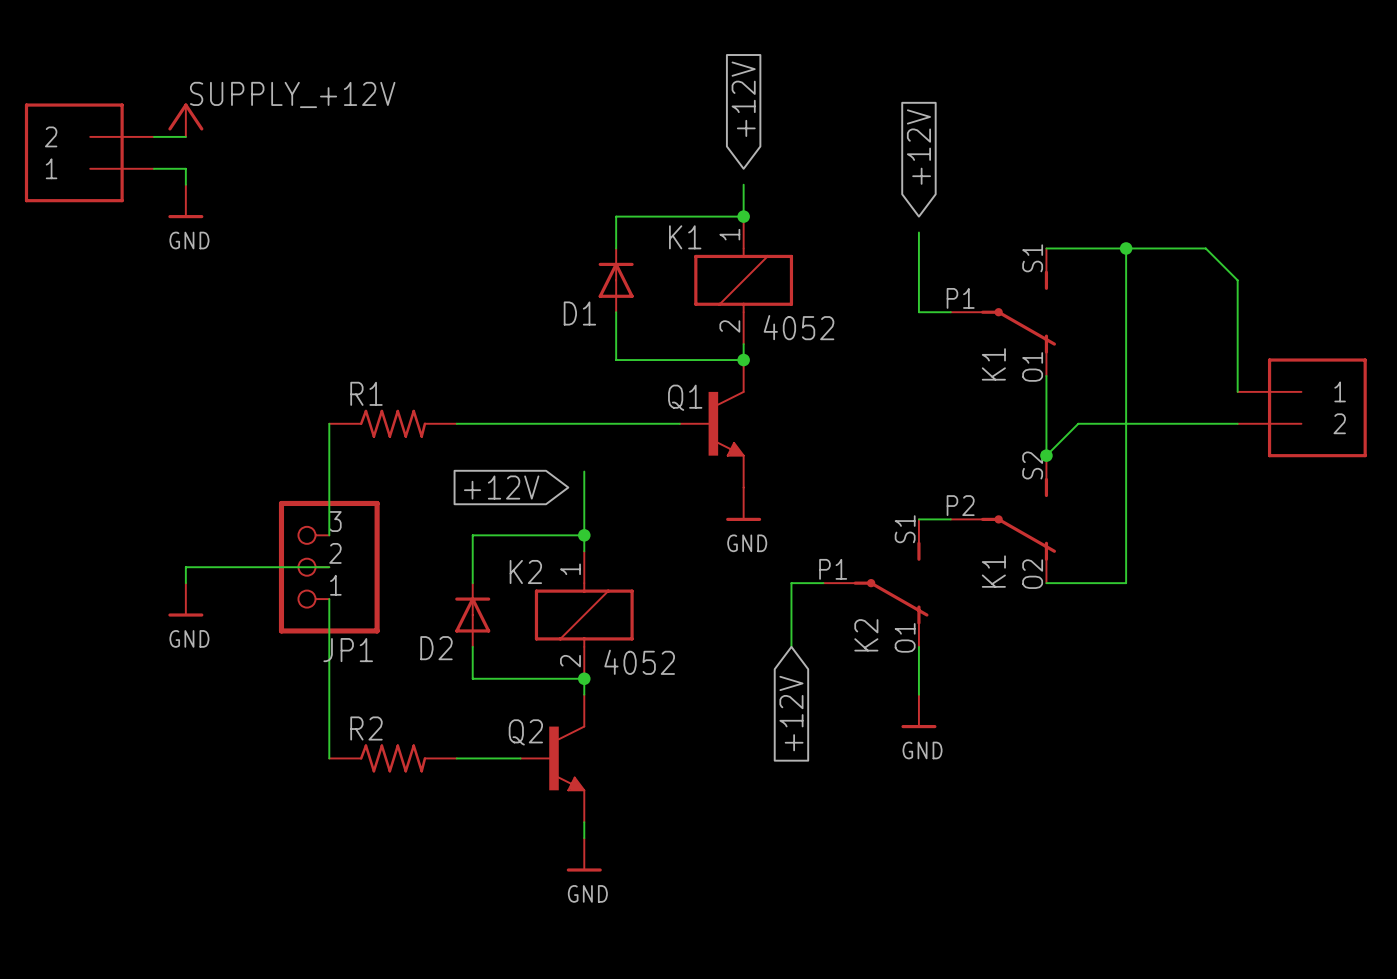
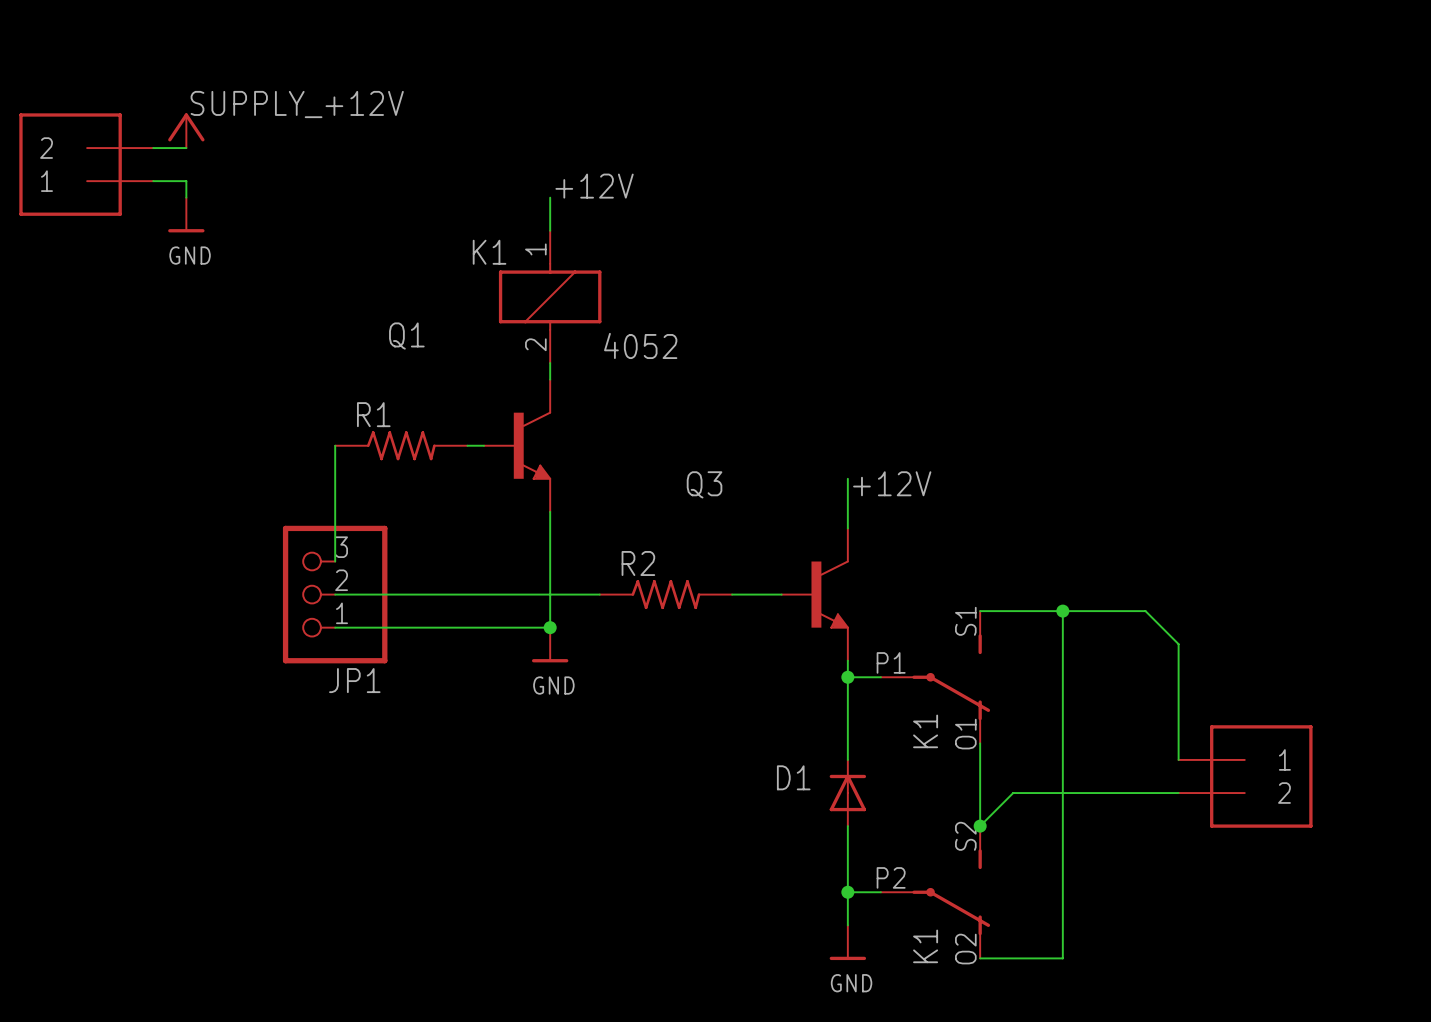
global label: +12V (743, 99) -> none
global label: +12V (918, 147) -> none
label: none -> +12V (594, 186)
wire: none -> (550, 197) (550, 230)
wire: (743, 184) (743, 216) (616, 216) (616, 248) -> none
junction: (743, 216) -> none
wire: (918, 232) (918, 312) (950, 312) -> none
wire: (1046, 248) (1205, 248) (1237, 280) (1237, 391) -> none
wire: (1126, 248) (1126, 583) (1110, 583) -> (1178, 759) (1178, 644) (1145, 611)
junction: (1126, 248) -> none
D1 position: (616, 280) -> (847, 793)
K1 position: (743, 280) -> (550, 296)
wire: (616, 312) (616, 360) (743, 360) (743, 344) -> none
K1: (1003, 312) -> none
D1 name position: D1 (579, 313) -> D1 (793, 777)
K1 value position: 4052 (799, 327) -> 4052 (640, 345)
wire: none -> (550, 363) (550, 379)
junction: (743, 360) -> none
wire: (1046, 375) (1046, 455) (1078, 423) (1237, 423) -> none
Q1 name position: Q1 (685, 397) -> Q1 (406, 336)
part: (1302, 407) -> none
wire: (472, 423) (679, 423) -> none
Q1 position: (712, 423) -> (517, 445)
junction: (1046, 455) -> none
label: none -> +12V (892, 483)
wire: (584, 471) (584, 551) -> none
global label: +12V (501, 487) -> none
power symbol: GND (743, 504) -> none
wire: (918, 519) (950, 519) -> (847, 677) (880, 677)
K1: (1003, 519) -> none
wire: (584, 535) (472, 535) (472, 583) -> none
junction: (584, 535) -> none
wire: (329, 567) (185, 567) (185, 583) -> (335, 594) (599, 594)
wire: none -> (732, 594) (781, 594)
Q3: none -> (815, 594)
wire: (823, 583) (791, 583) (791, 646) -> none
K2: (875, 583) -> none
wire: none -> (980, 611) (1079, 611)
wire: none -> (1062, 611) (1062, 958) (980, 958)
junction: none -> (1062, 611)
power symbol: GND (185, 599) -> none
wire: (329, 599) (329, 758) -> (335, 627) (550, 627) (550, 511)
junction: none -> (550, 627)
D2: (472, 615) -> none
power symbol: none -> GND (550, 645)
K2: 4052 (584, 615) -> none
wire: none -> (847, 660) (847, 759)
wire: (472, 646) (472, 678) (584, 678) (584, 694) -> none
junction: none -> (847, 677)
K1: none -> (935, 677)
wire: (918, 646) (918, 694) -> (847, 478) (847, 528)
junction: (584, 678) -> none
wire: none -> (980, 743) (980, 826) (1013, 793) (1178, 793)
power symbol: GND (918, 711) -> none
global label: +12V (791, 713) -> none
part: none -> (1245, 776)
R2 position: (393, 758) -> (665, 594)
wire: (456, 758) (520, 758) -> none
Q2: (552, 758) -> none
wire: none -> (847, 826) (847, 925)
junction: none -> (980, 826)
wire: (584, 822) (584, 838) -> none
power symbol: GND (584, 854) -> none
wire: none -> (847, 892) (880, 892)
junction: none -> (847, 892)
K1: none -> (935, 892)
power symbol: none -> GND (847, 942)

